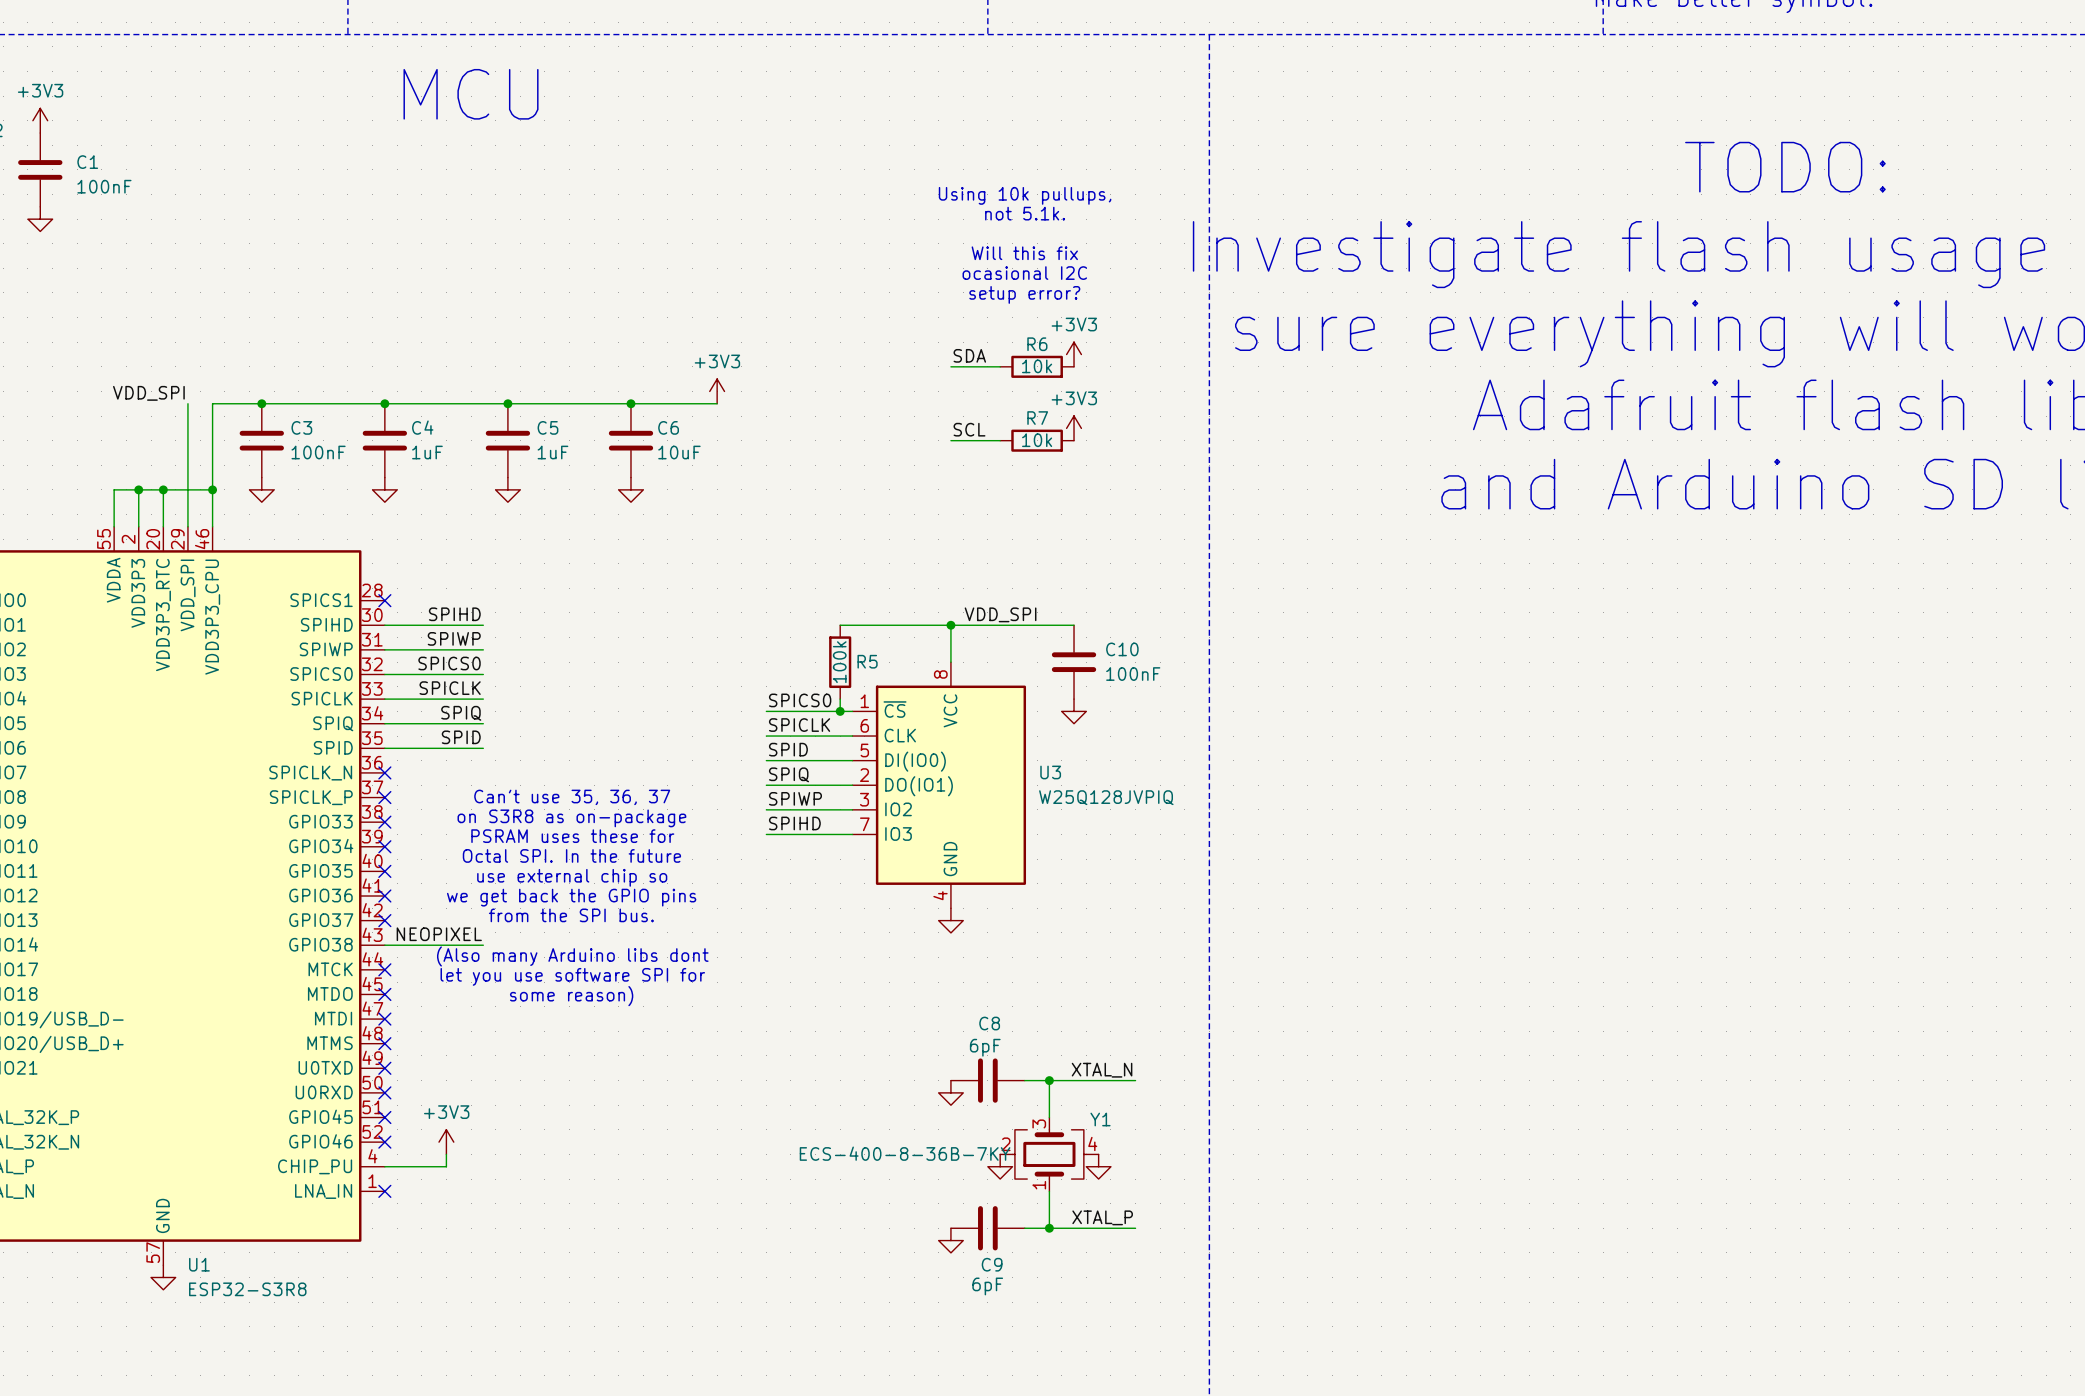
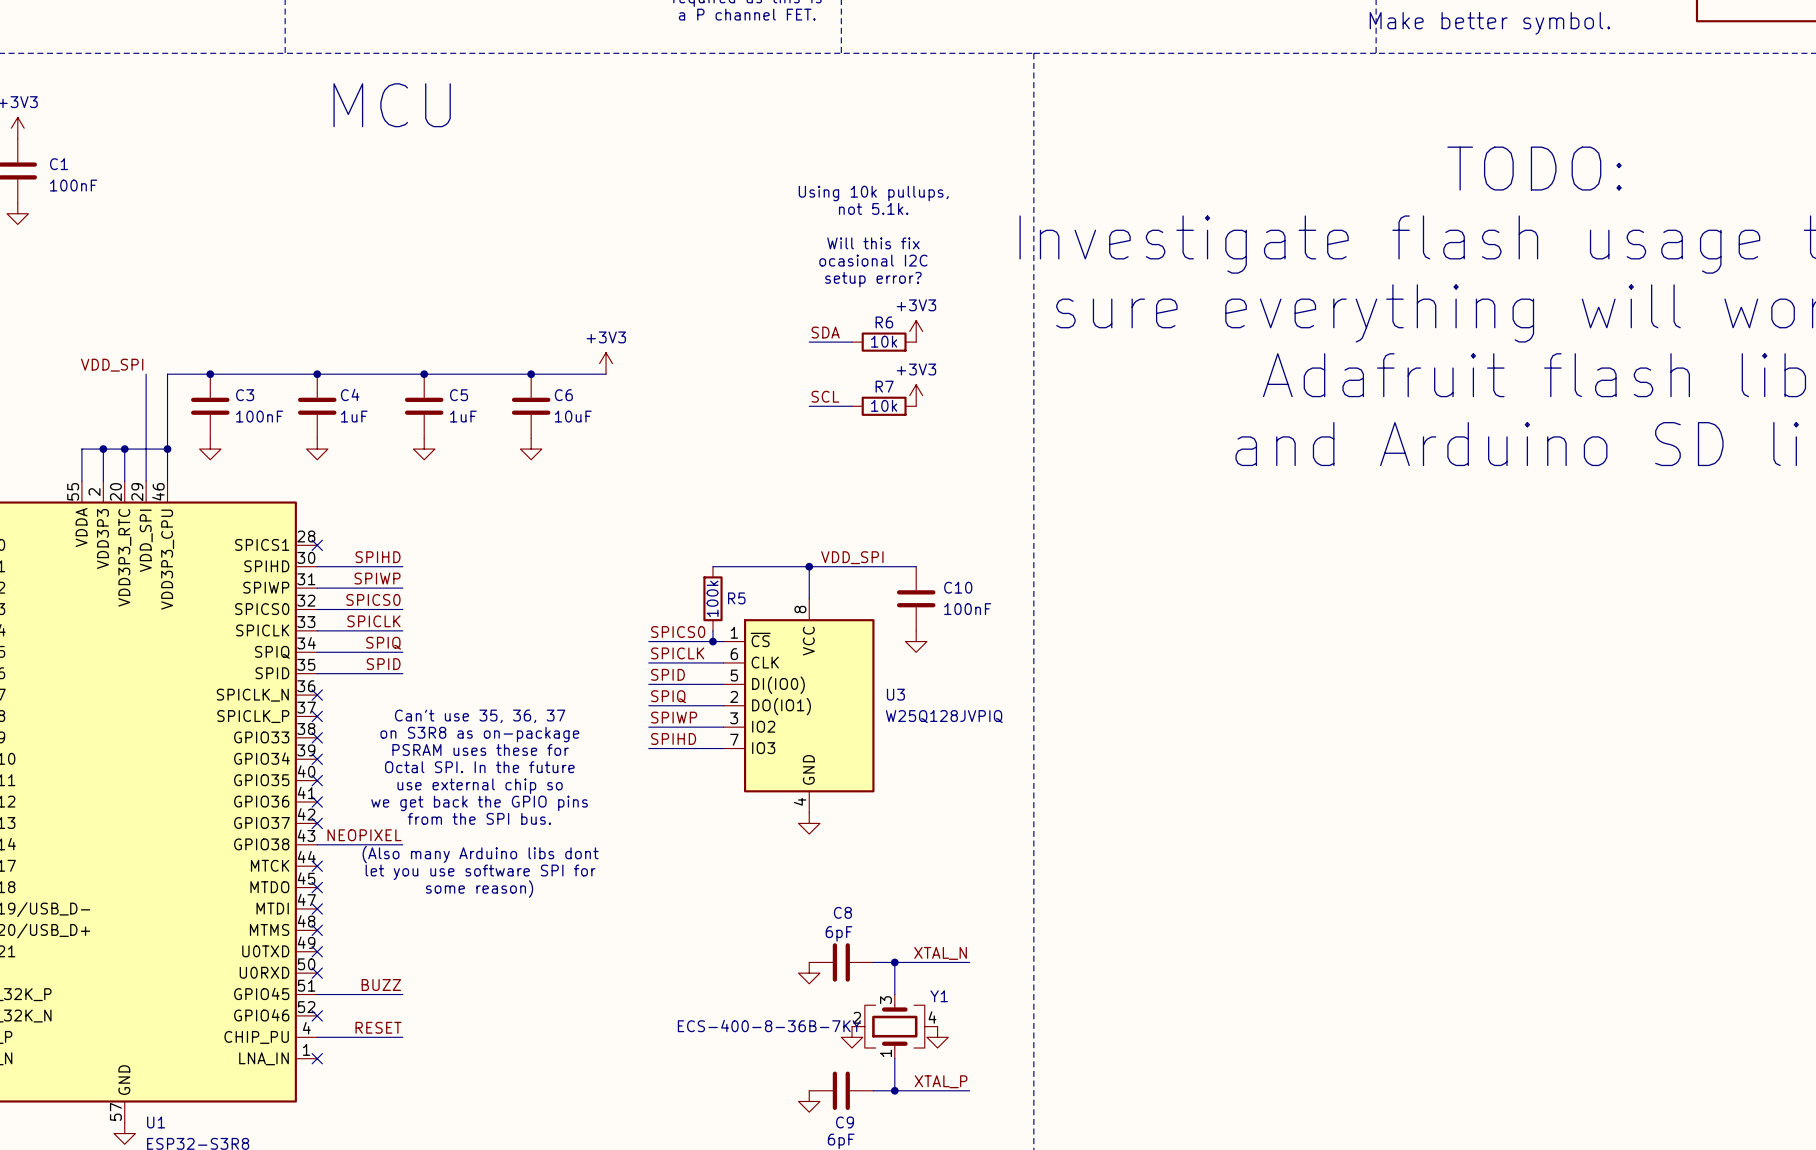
label: none -> BUZZ (381, 984)
wire: none -> (317, 994) (402, 994)
no-connect mark: (384, 1117) -> none
power symbol: +3V3 (446, 1142) -> none
wire: (446, 1154) (446, 1166) -> (402, 1037) (370, 1037)
label: none -> RESET (378, 1027)

